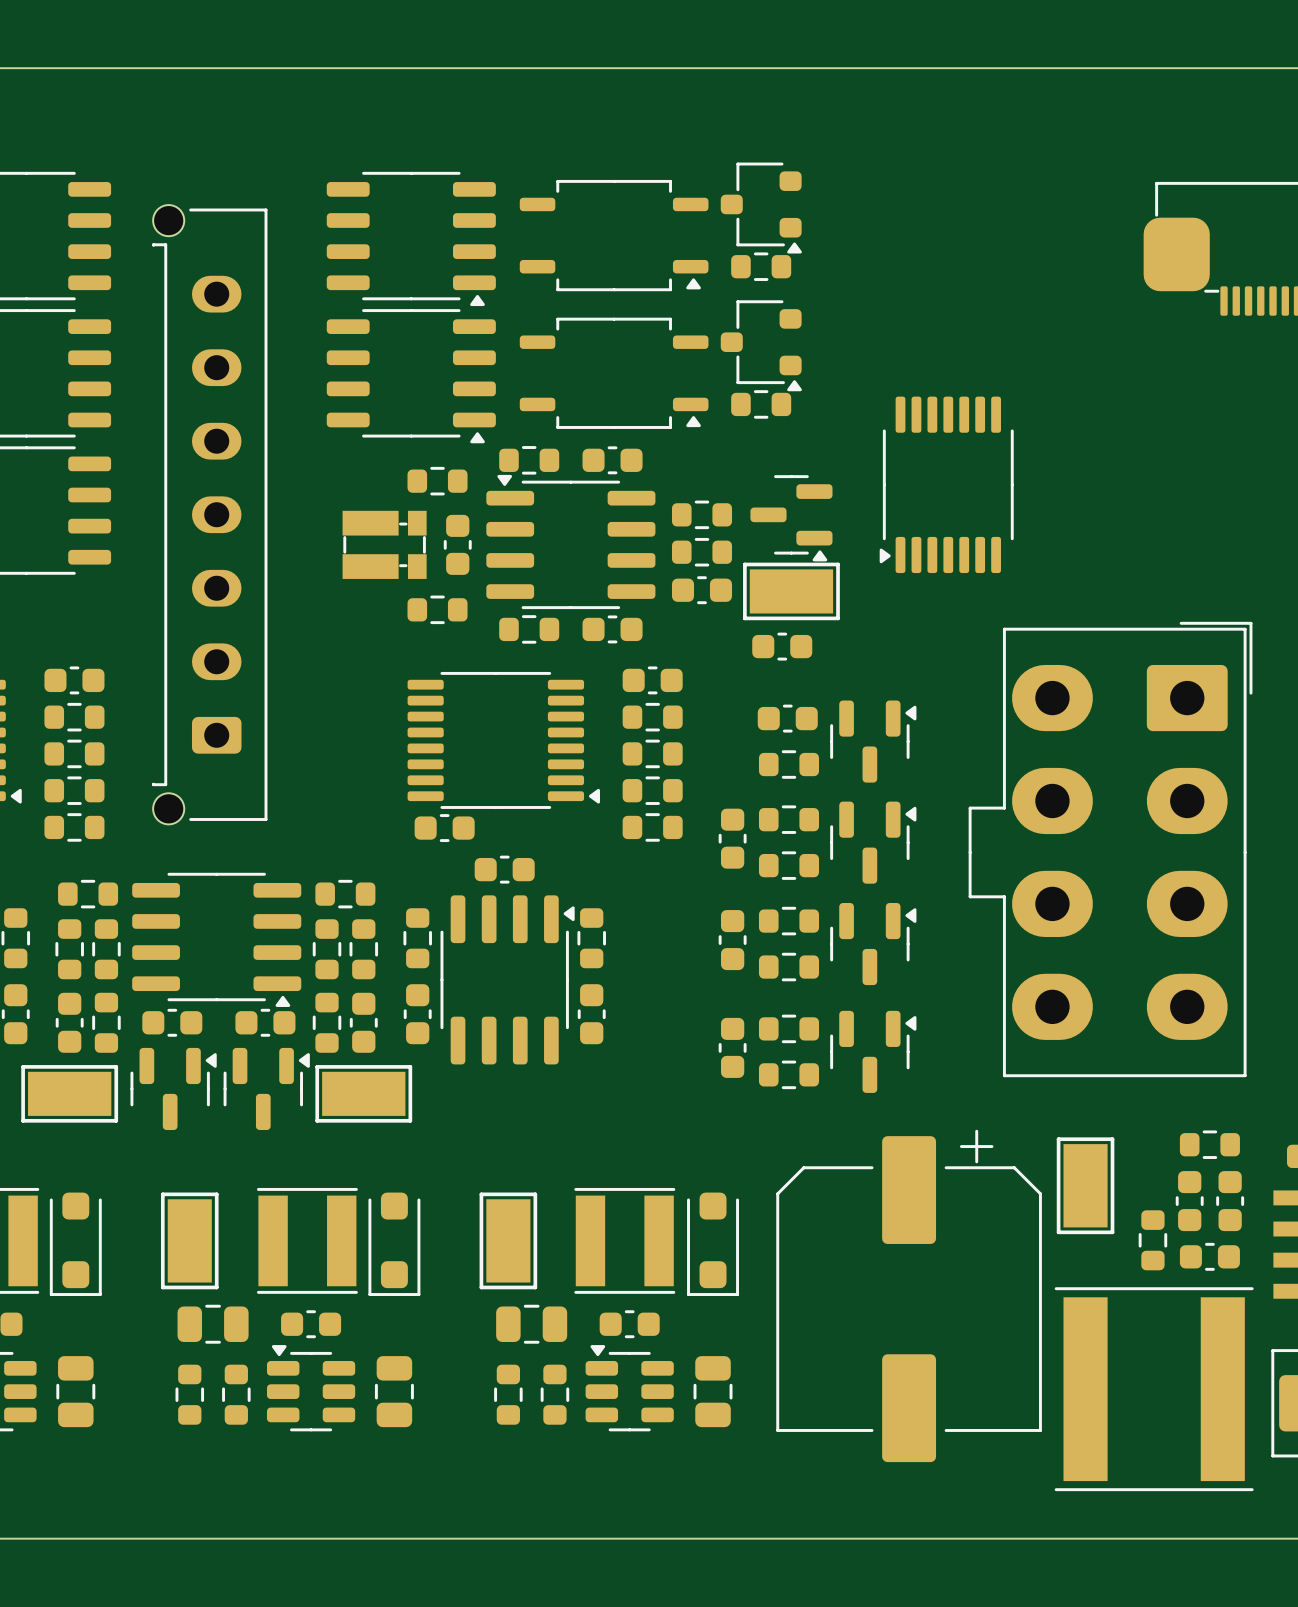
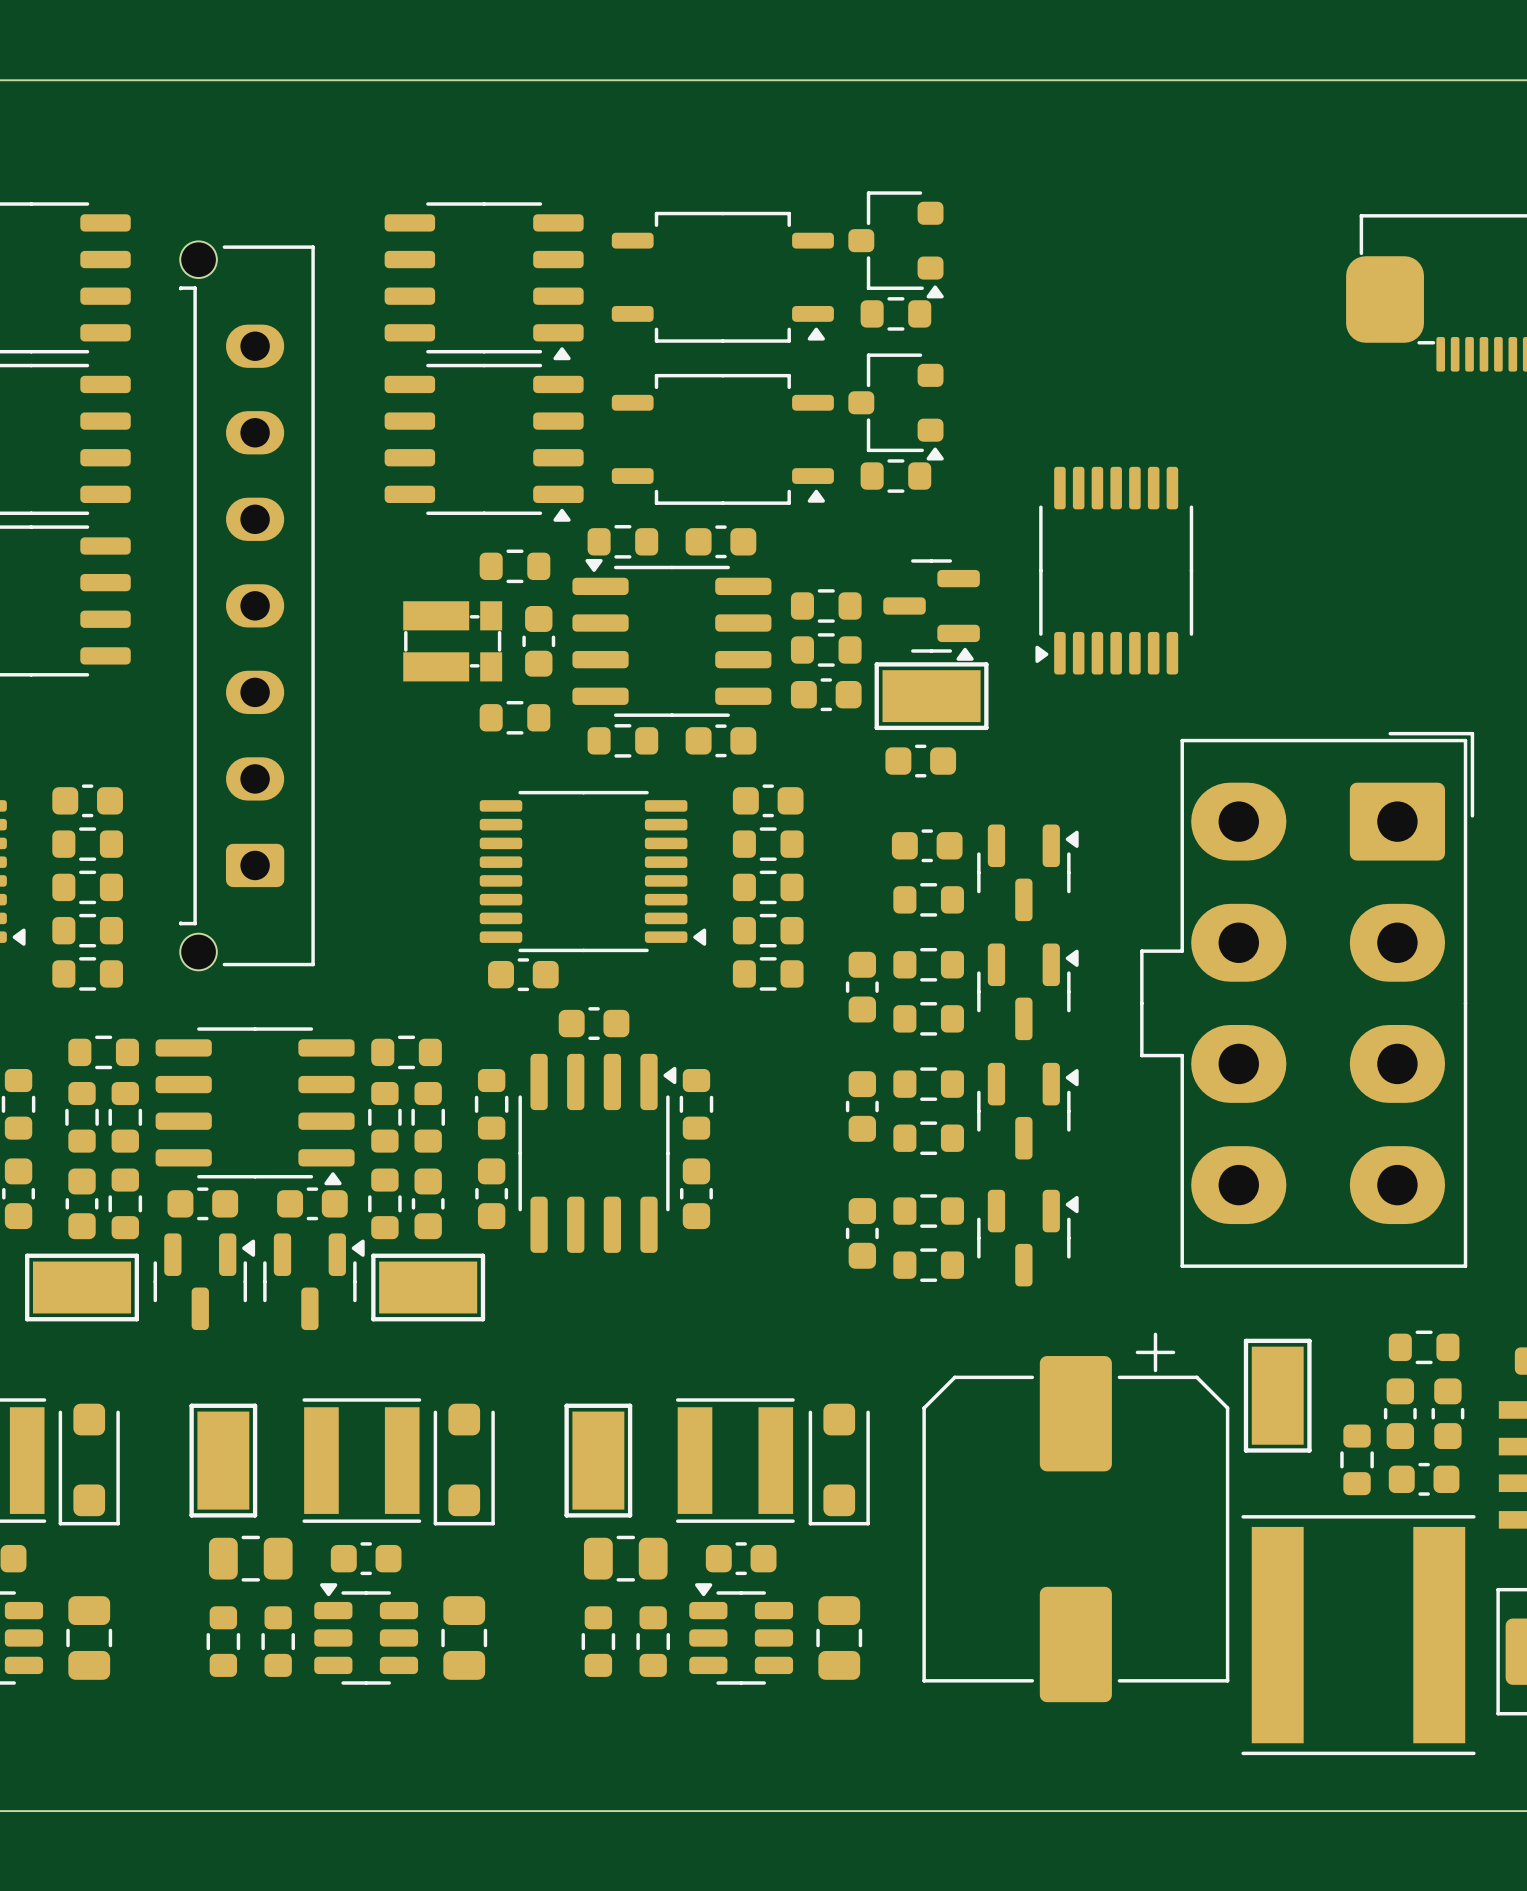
part footprint: [776, 1129, 1042, 1463] -> [922, 1332, 1230, 1703]

